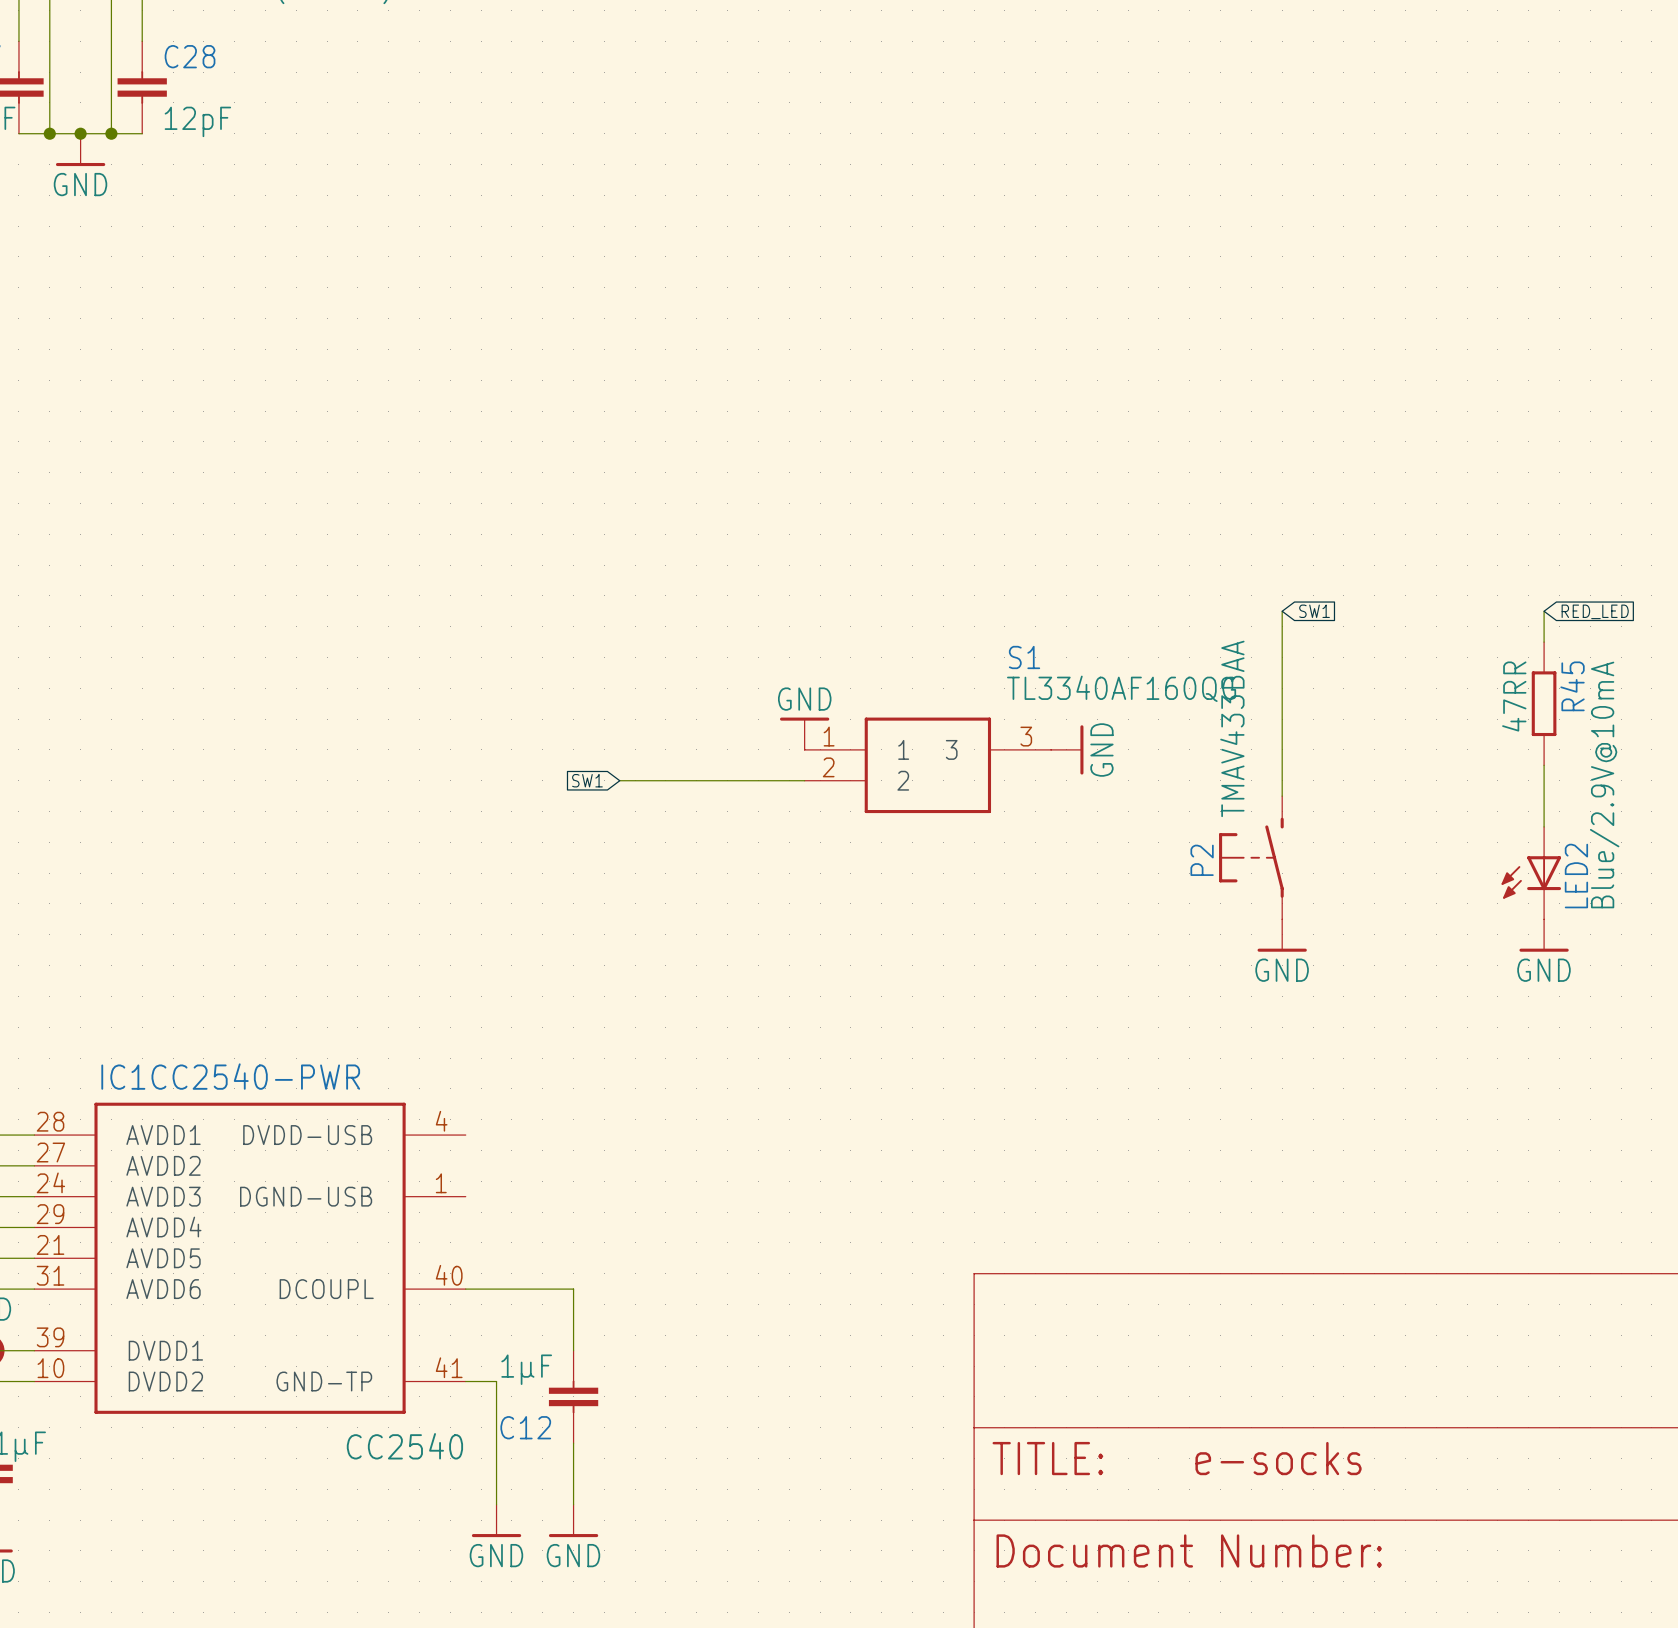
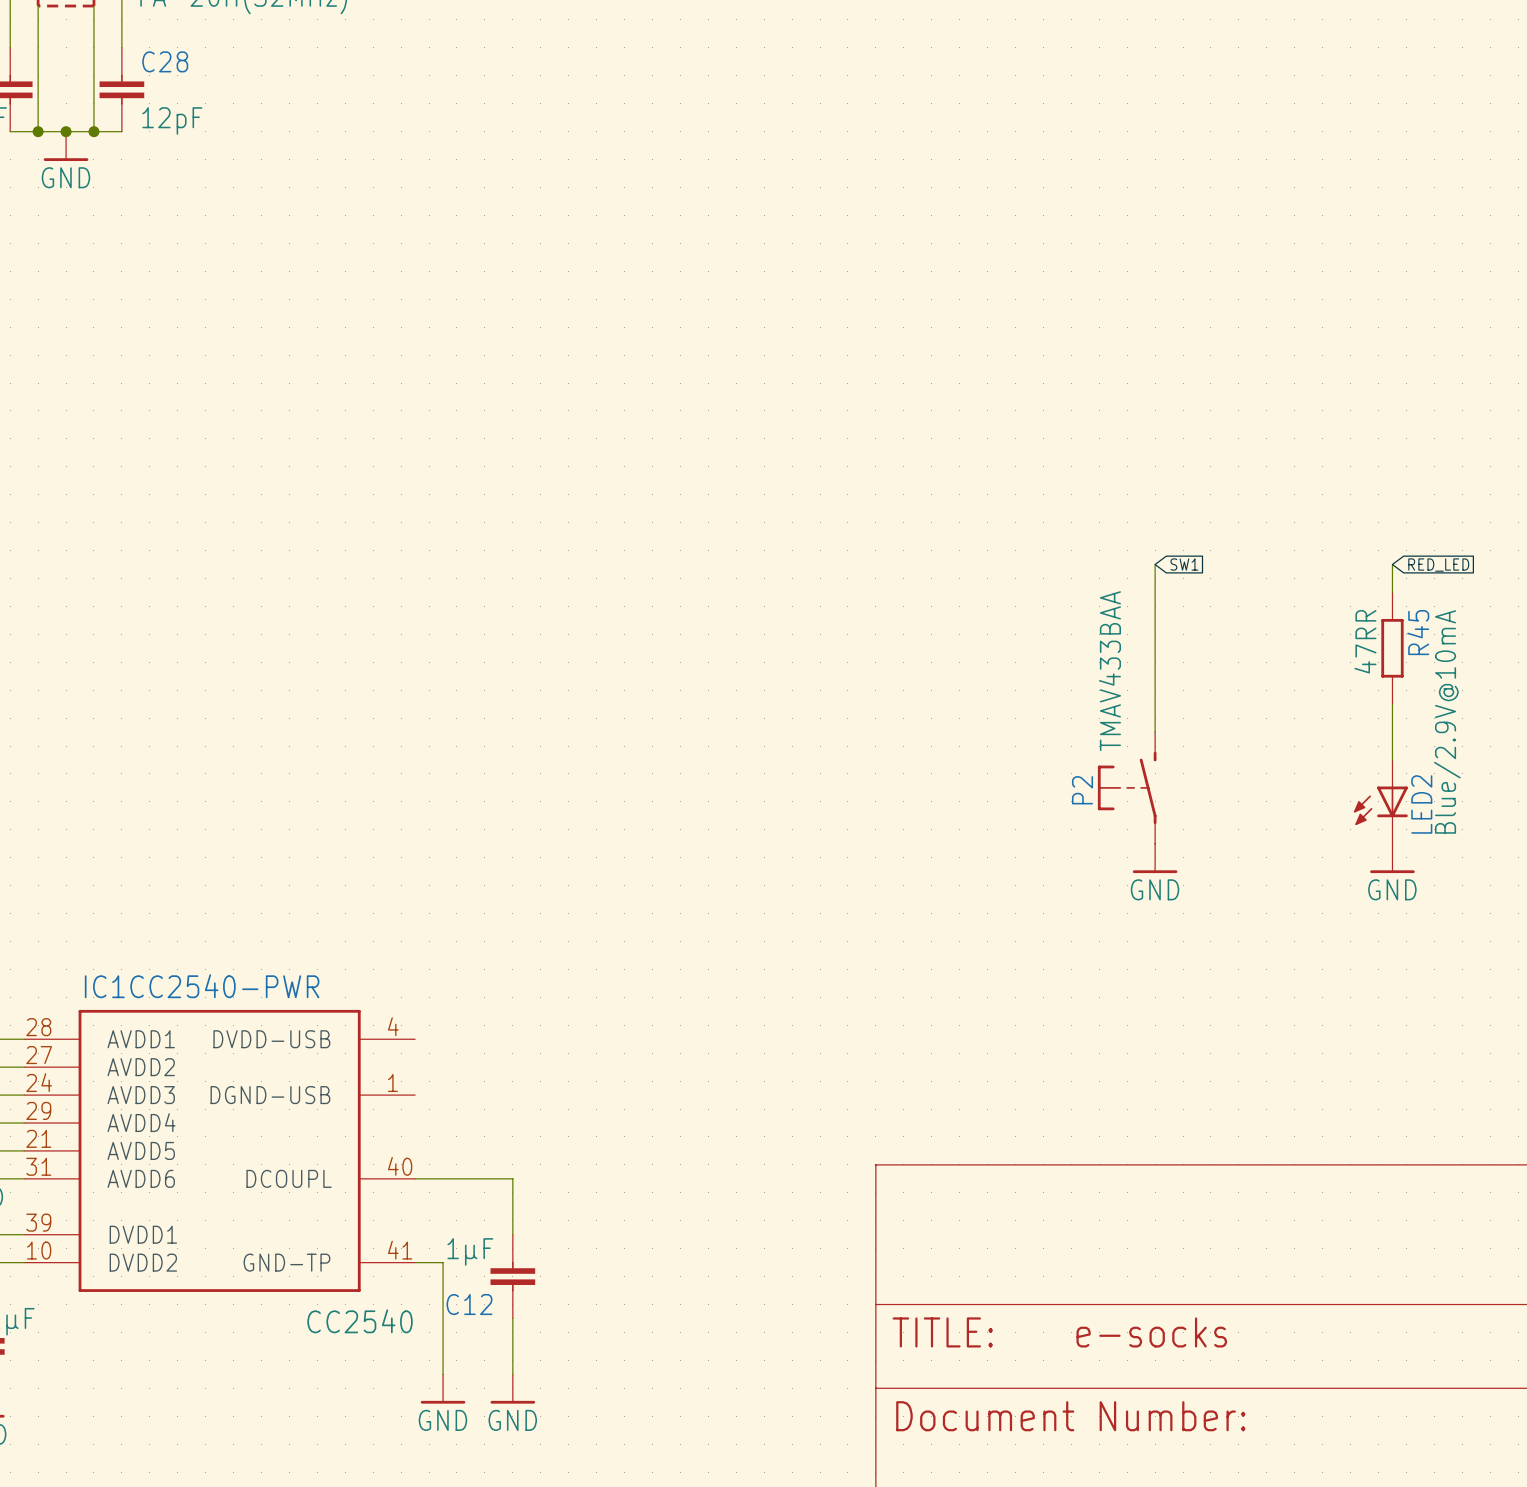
power symbol: GND (804, 733) -> none
power symbol: GND (1067, 749) -> none
S1: TL3340AF160QG (927, 765) -> none
global label: SW1 (587, 780) -> none
wire: (619, 780) (804, 780) -> none

